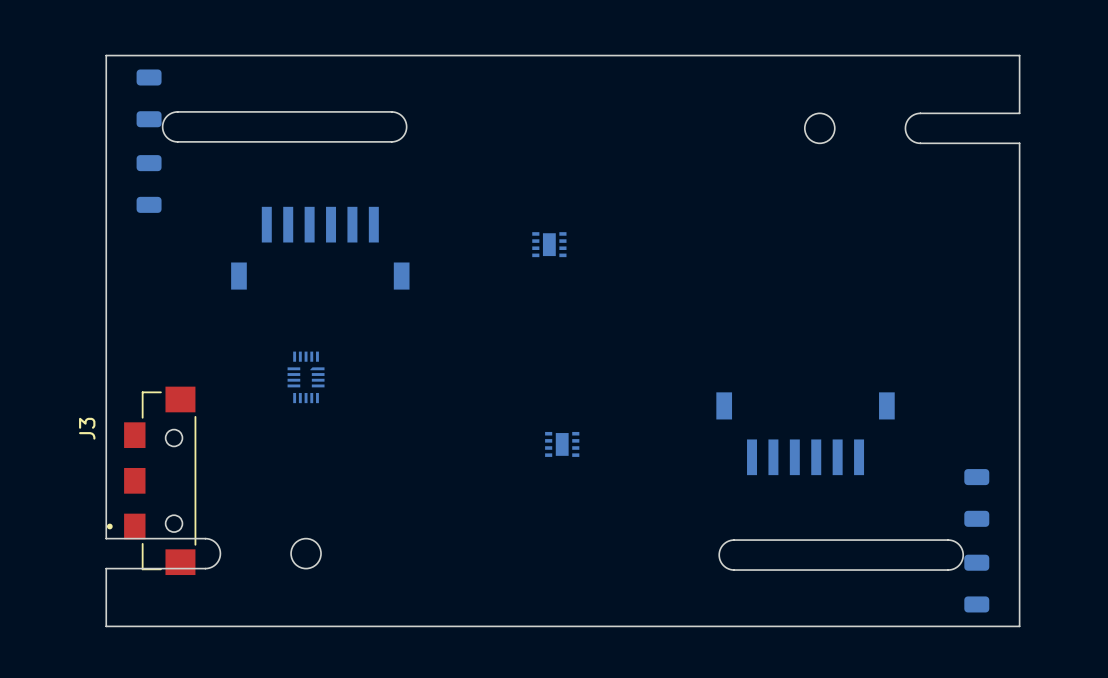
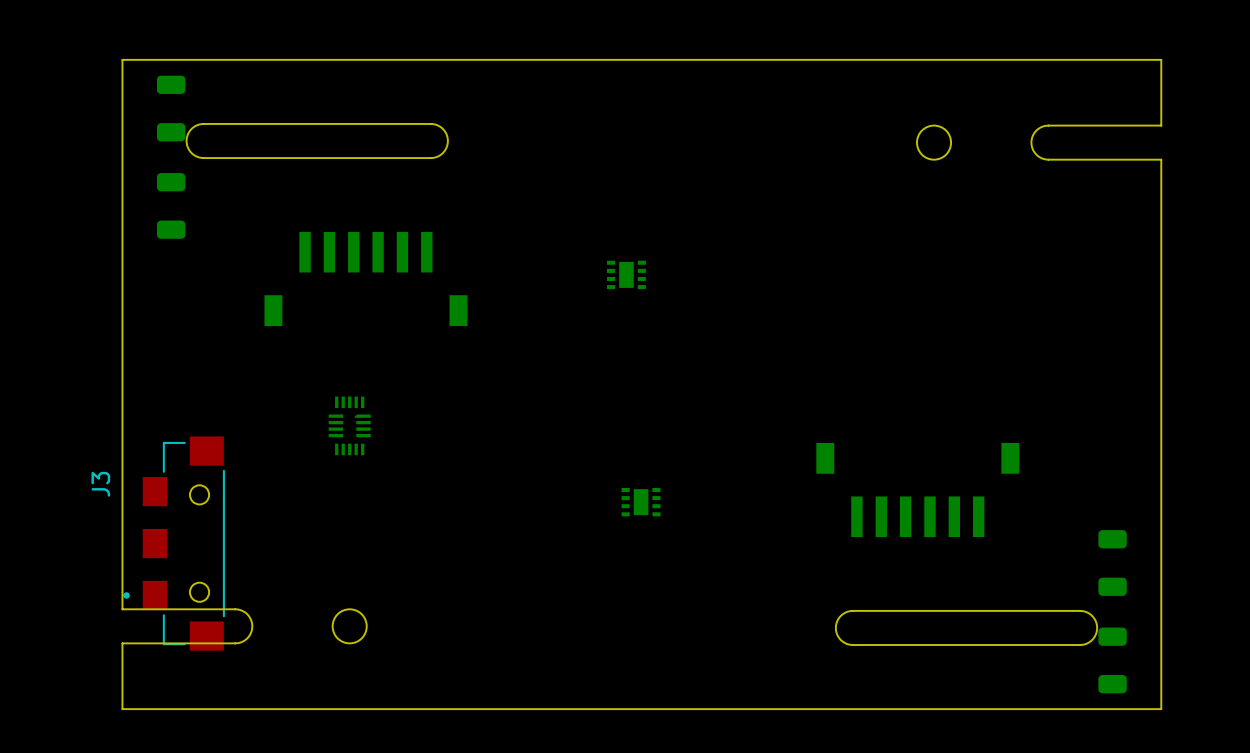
board edge: (377, 111) (399, 113) (404, 119) (406, 126) (404, 134) (399, 139) (377, 141) -> (430, 123) (442, 128) (447, 141) (442, 153) (430, 158)
board edge: (748, 540) (727, 541) (720, 548) (719, 555) (720, 562) (727, 568) (748, 570) -> (852, 610) (840, 615) (835, 627) (840, 640) (852, 645)

